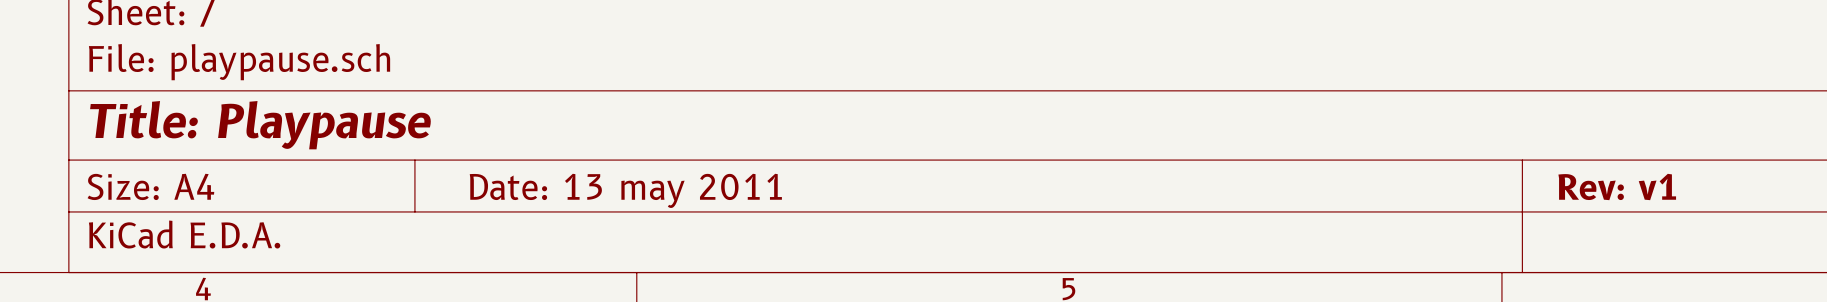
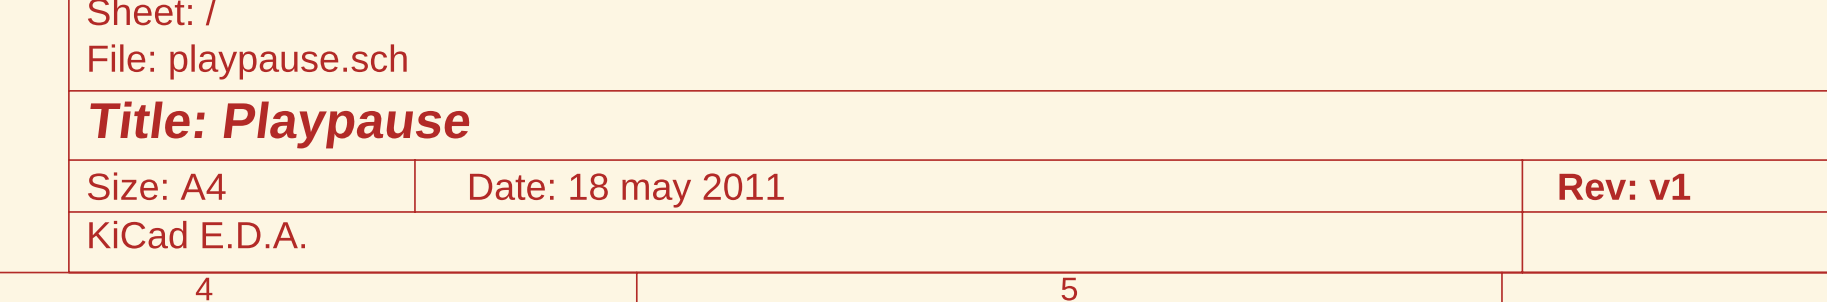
title block: Date: 13 may 2011 (625, 190) -> Date: 18 may 2011 (626, 190)

